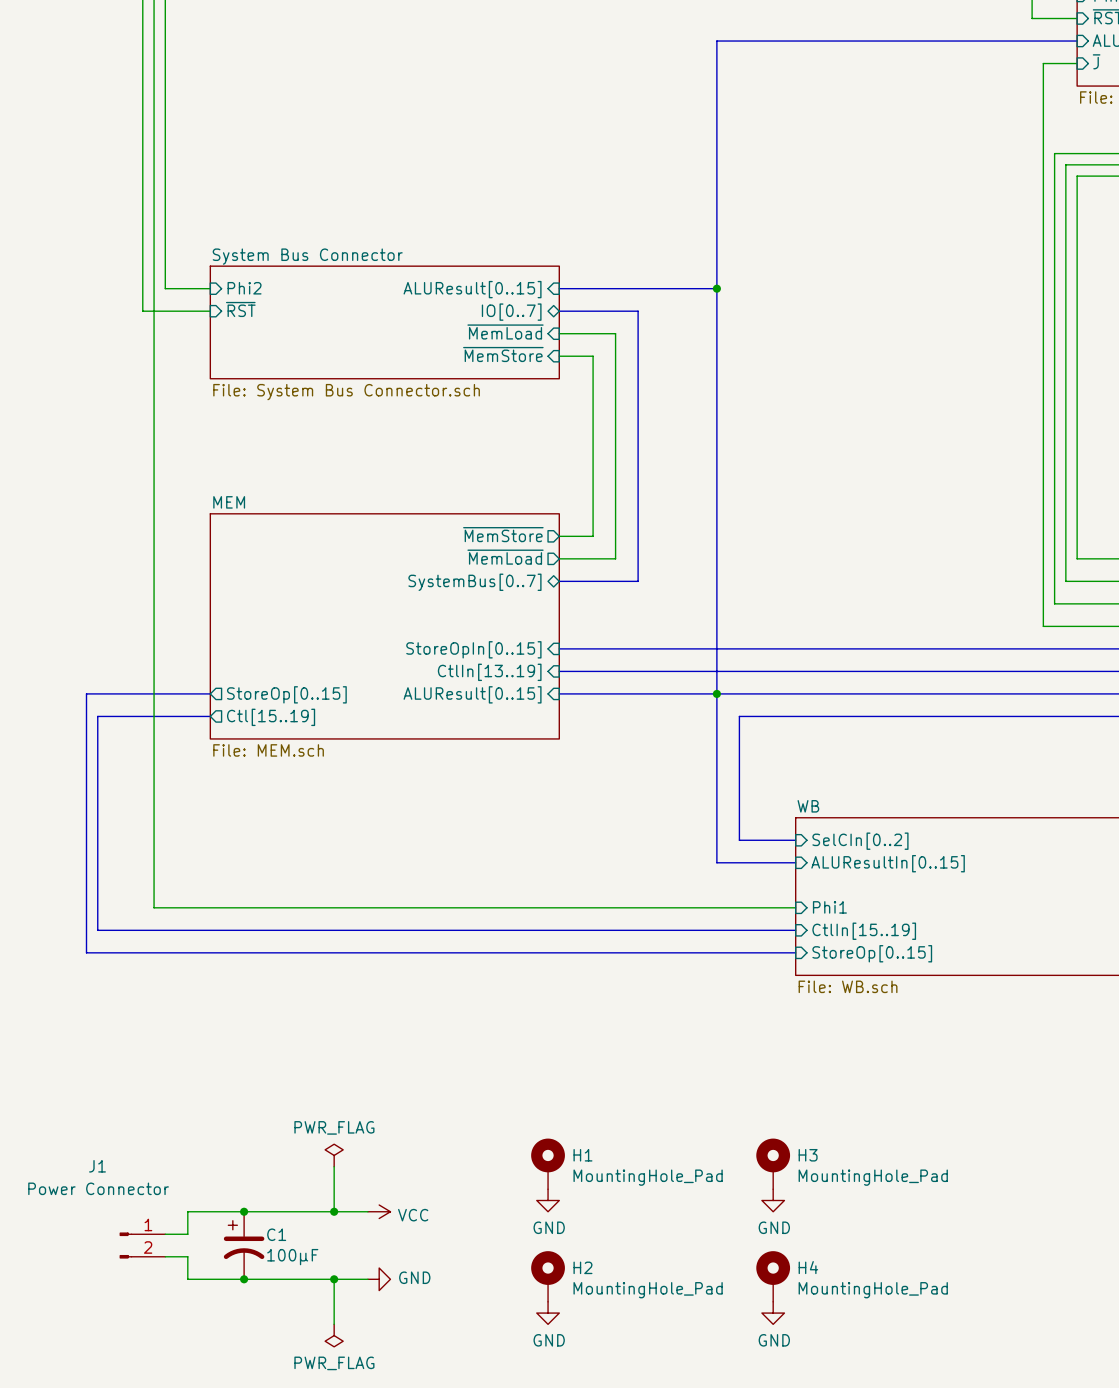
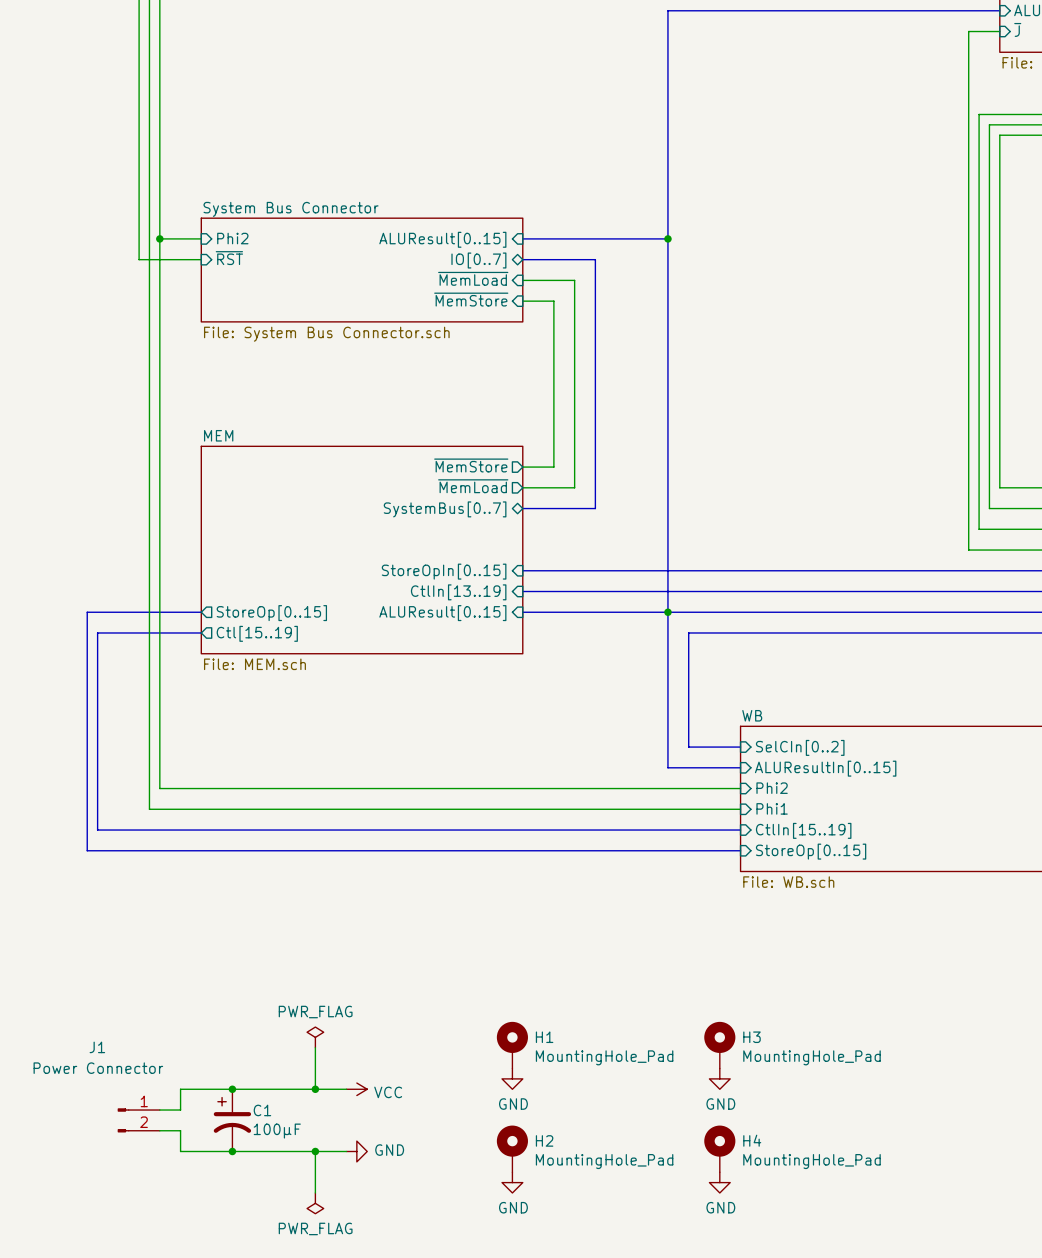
wire: none -> (159, 238) (159, 788) (740, 788)
junction: none -> (159, 238)
sheet pin: none -> Phi2 (772, 788)

